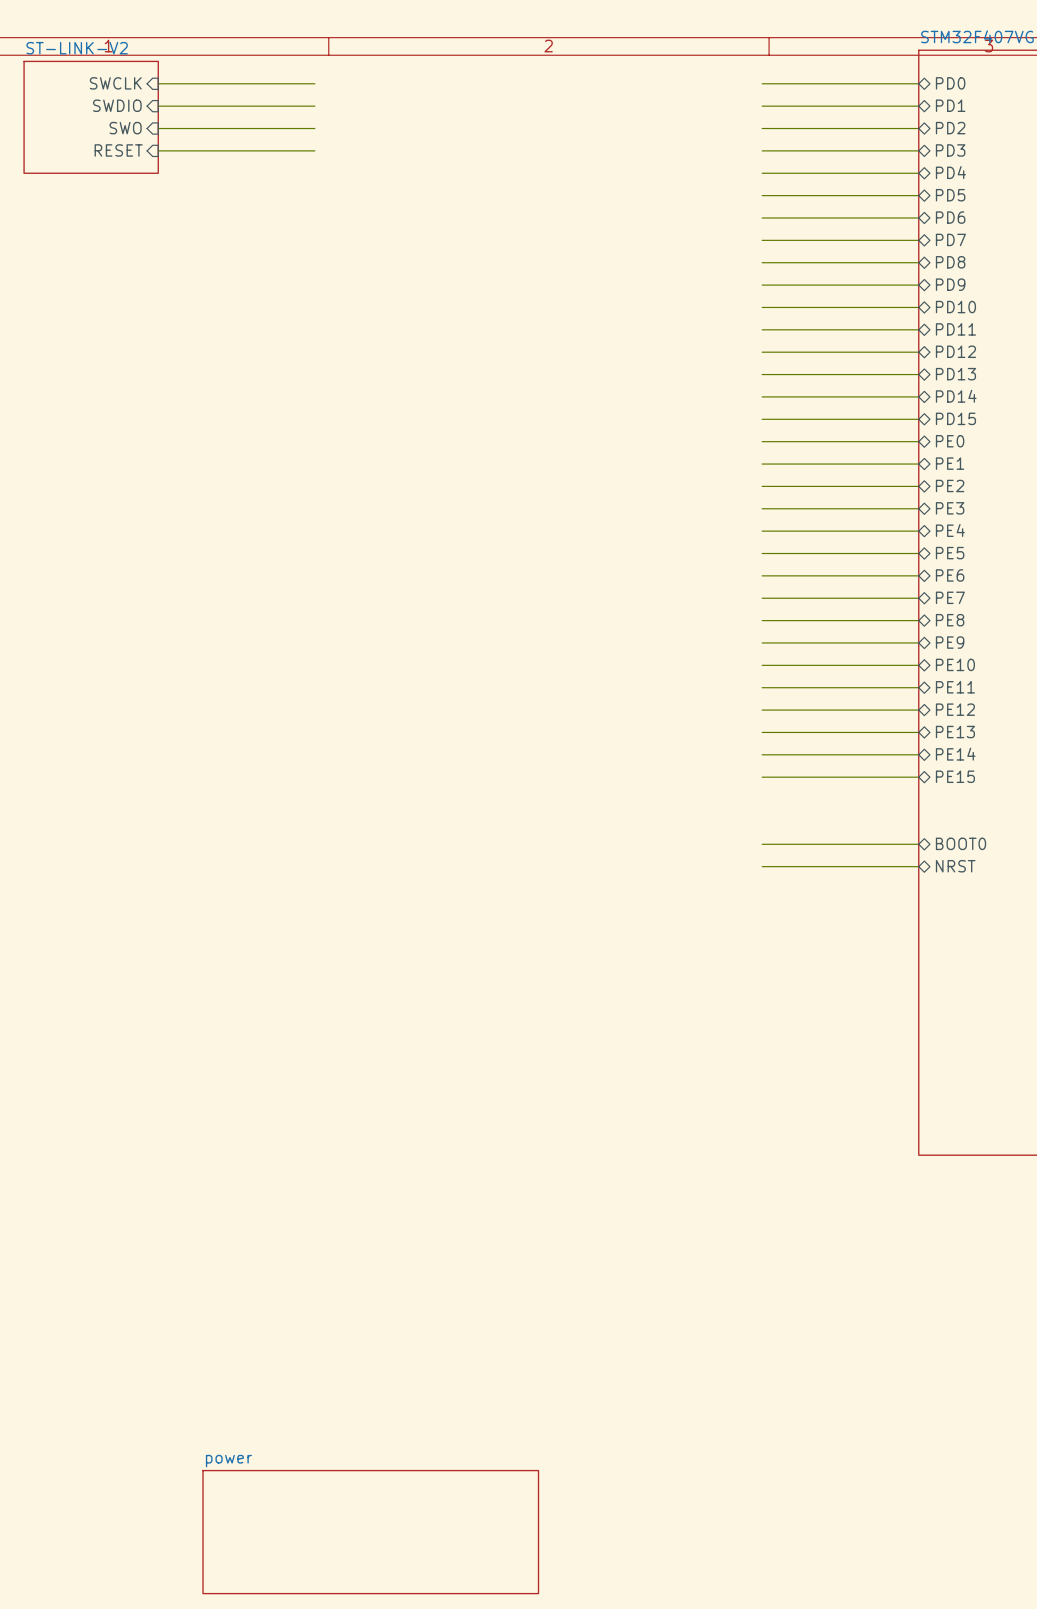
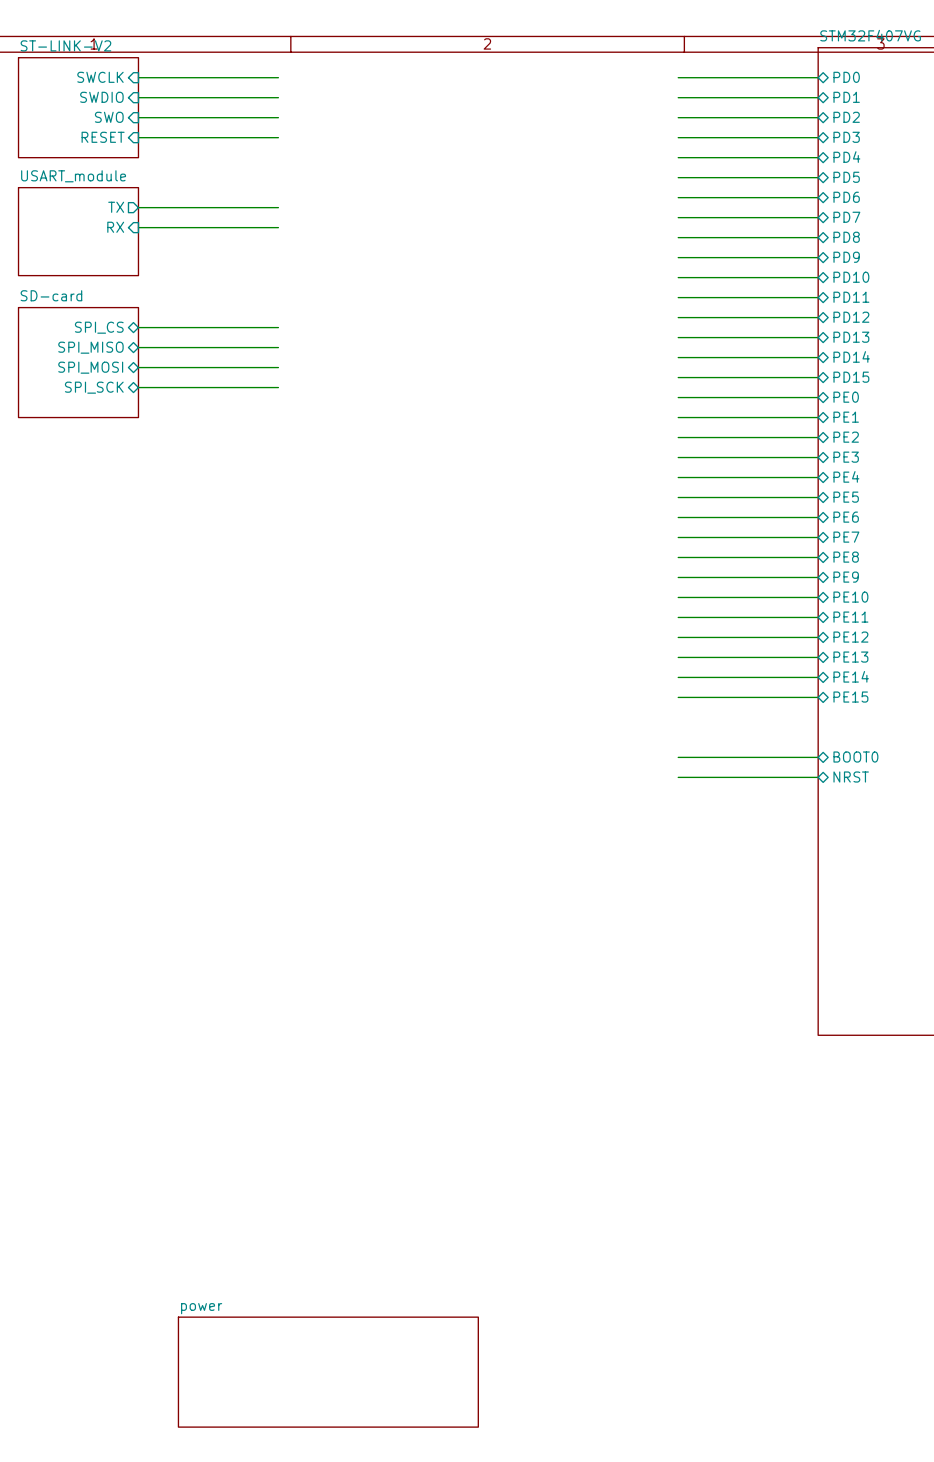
sheet pin: none -> TX (116, 207)
wire: none -> (138, 207) (278, 207)
sheet pin: none -> RX (115, 227)
wire: none -> (138, 227) (278, 227)
sheet USART_module: none -> (78, 231)
sheet pin: none -> SPI_CS (99, 327)
wire: none -> (138, 327) (278, 327)
sheet pin: none -> SPI_MISO (90, 347)
wire: none -> (138, 347) (278, 347)
sheet SD-card: none -> (78, 362)
sheet pin: none -> SPI_MOSI (90, 367)
wire: none -> (138, 367) (278, 367)
sheet pin: none -> SPI_SCK (94, 387)
wire: none -> (138, 387) (278, 387)

